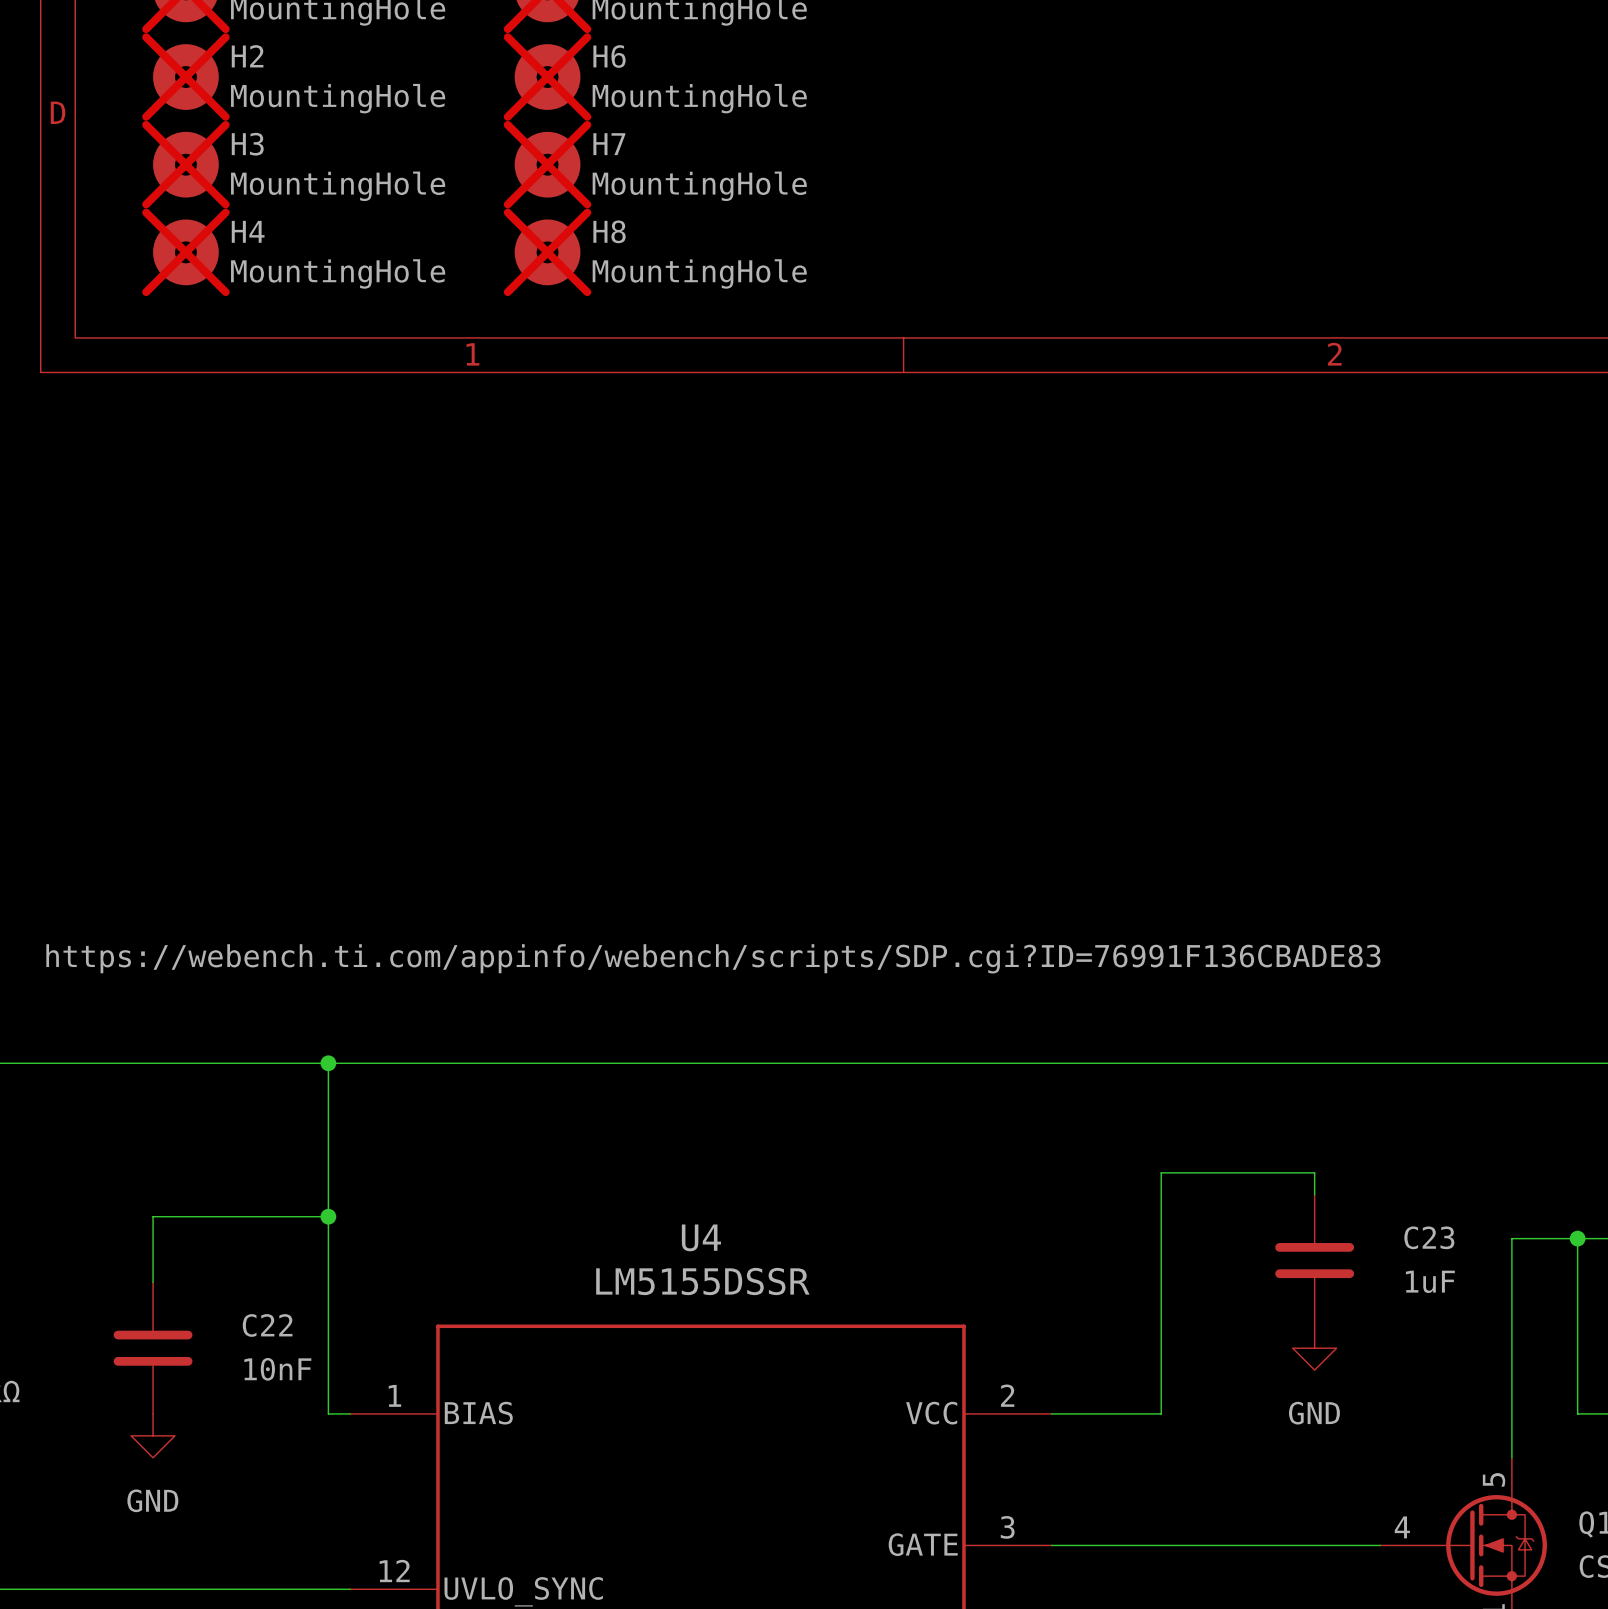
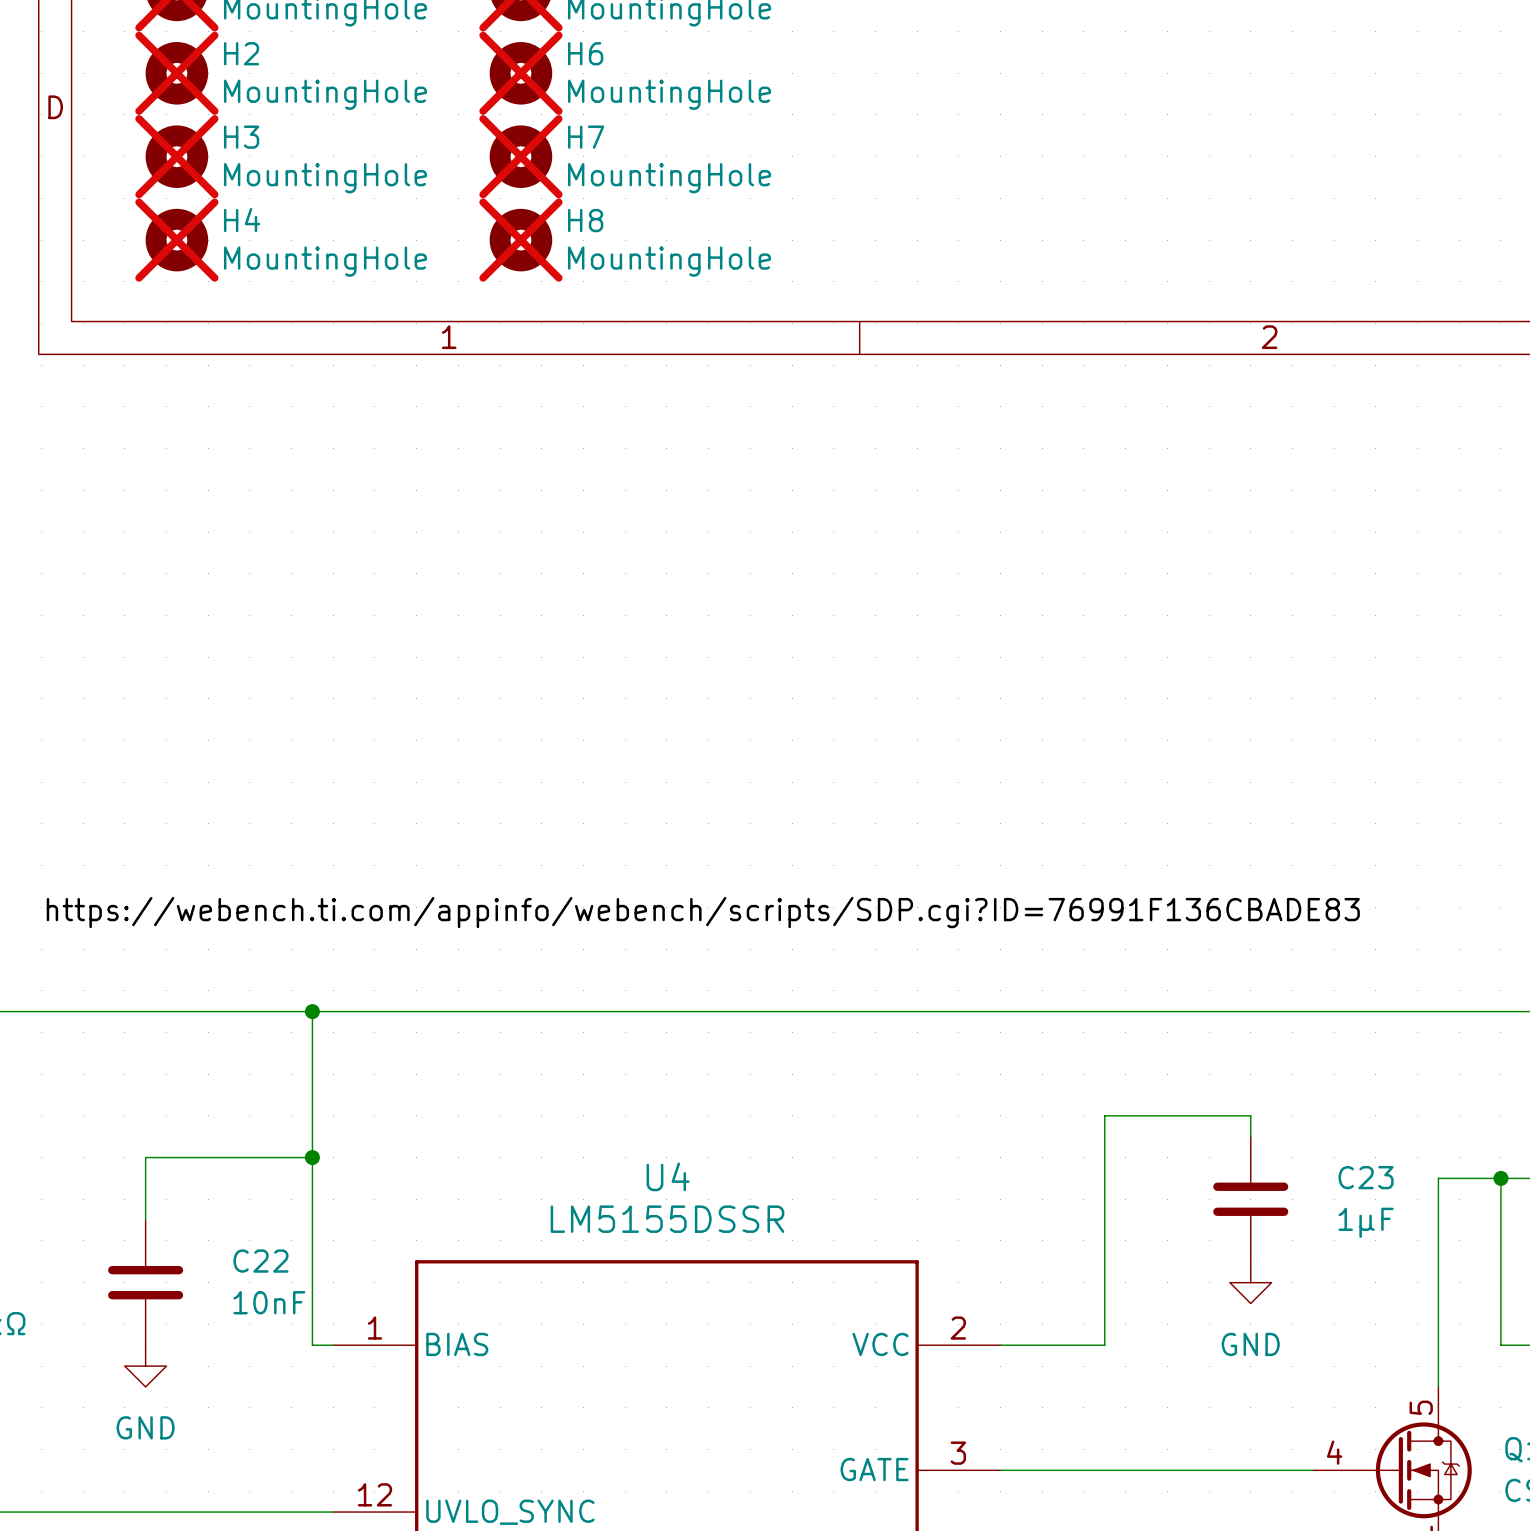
C23 value: 1uF (1430, 1281) -> 1µF (1366, 1222)

